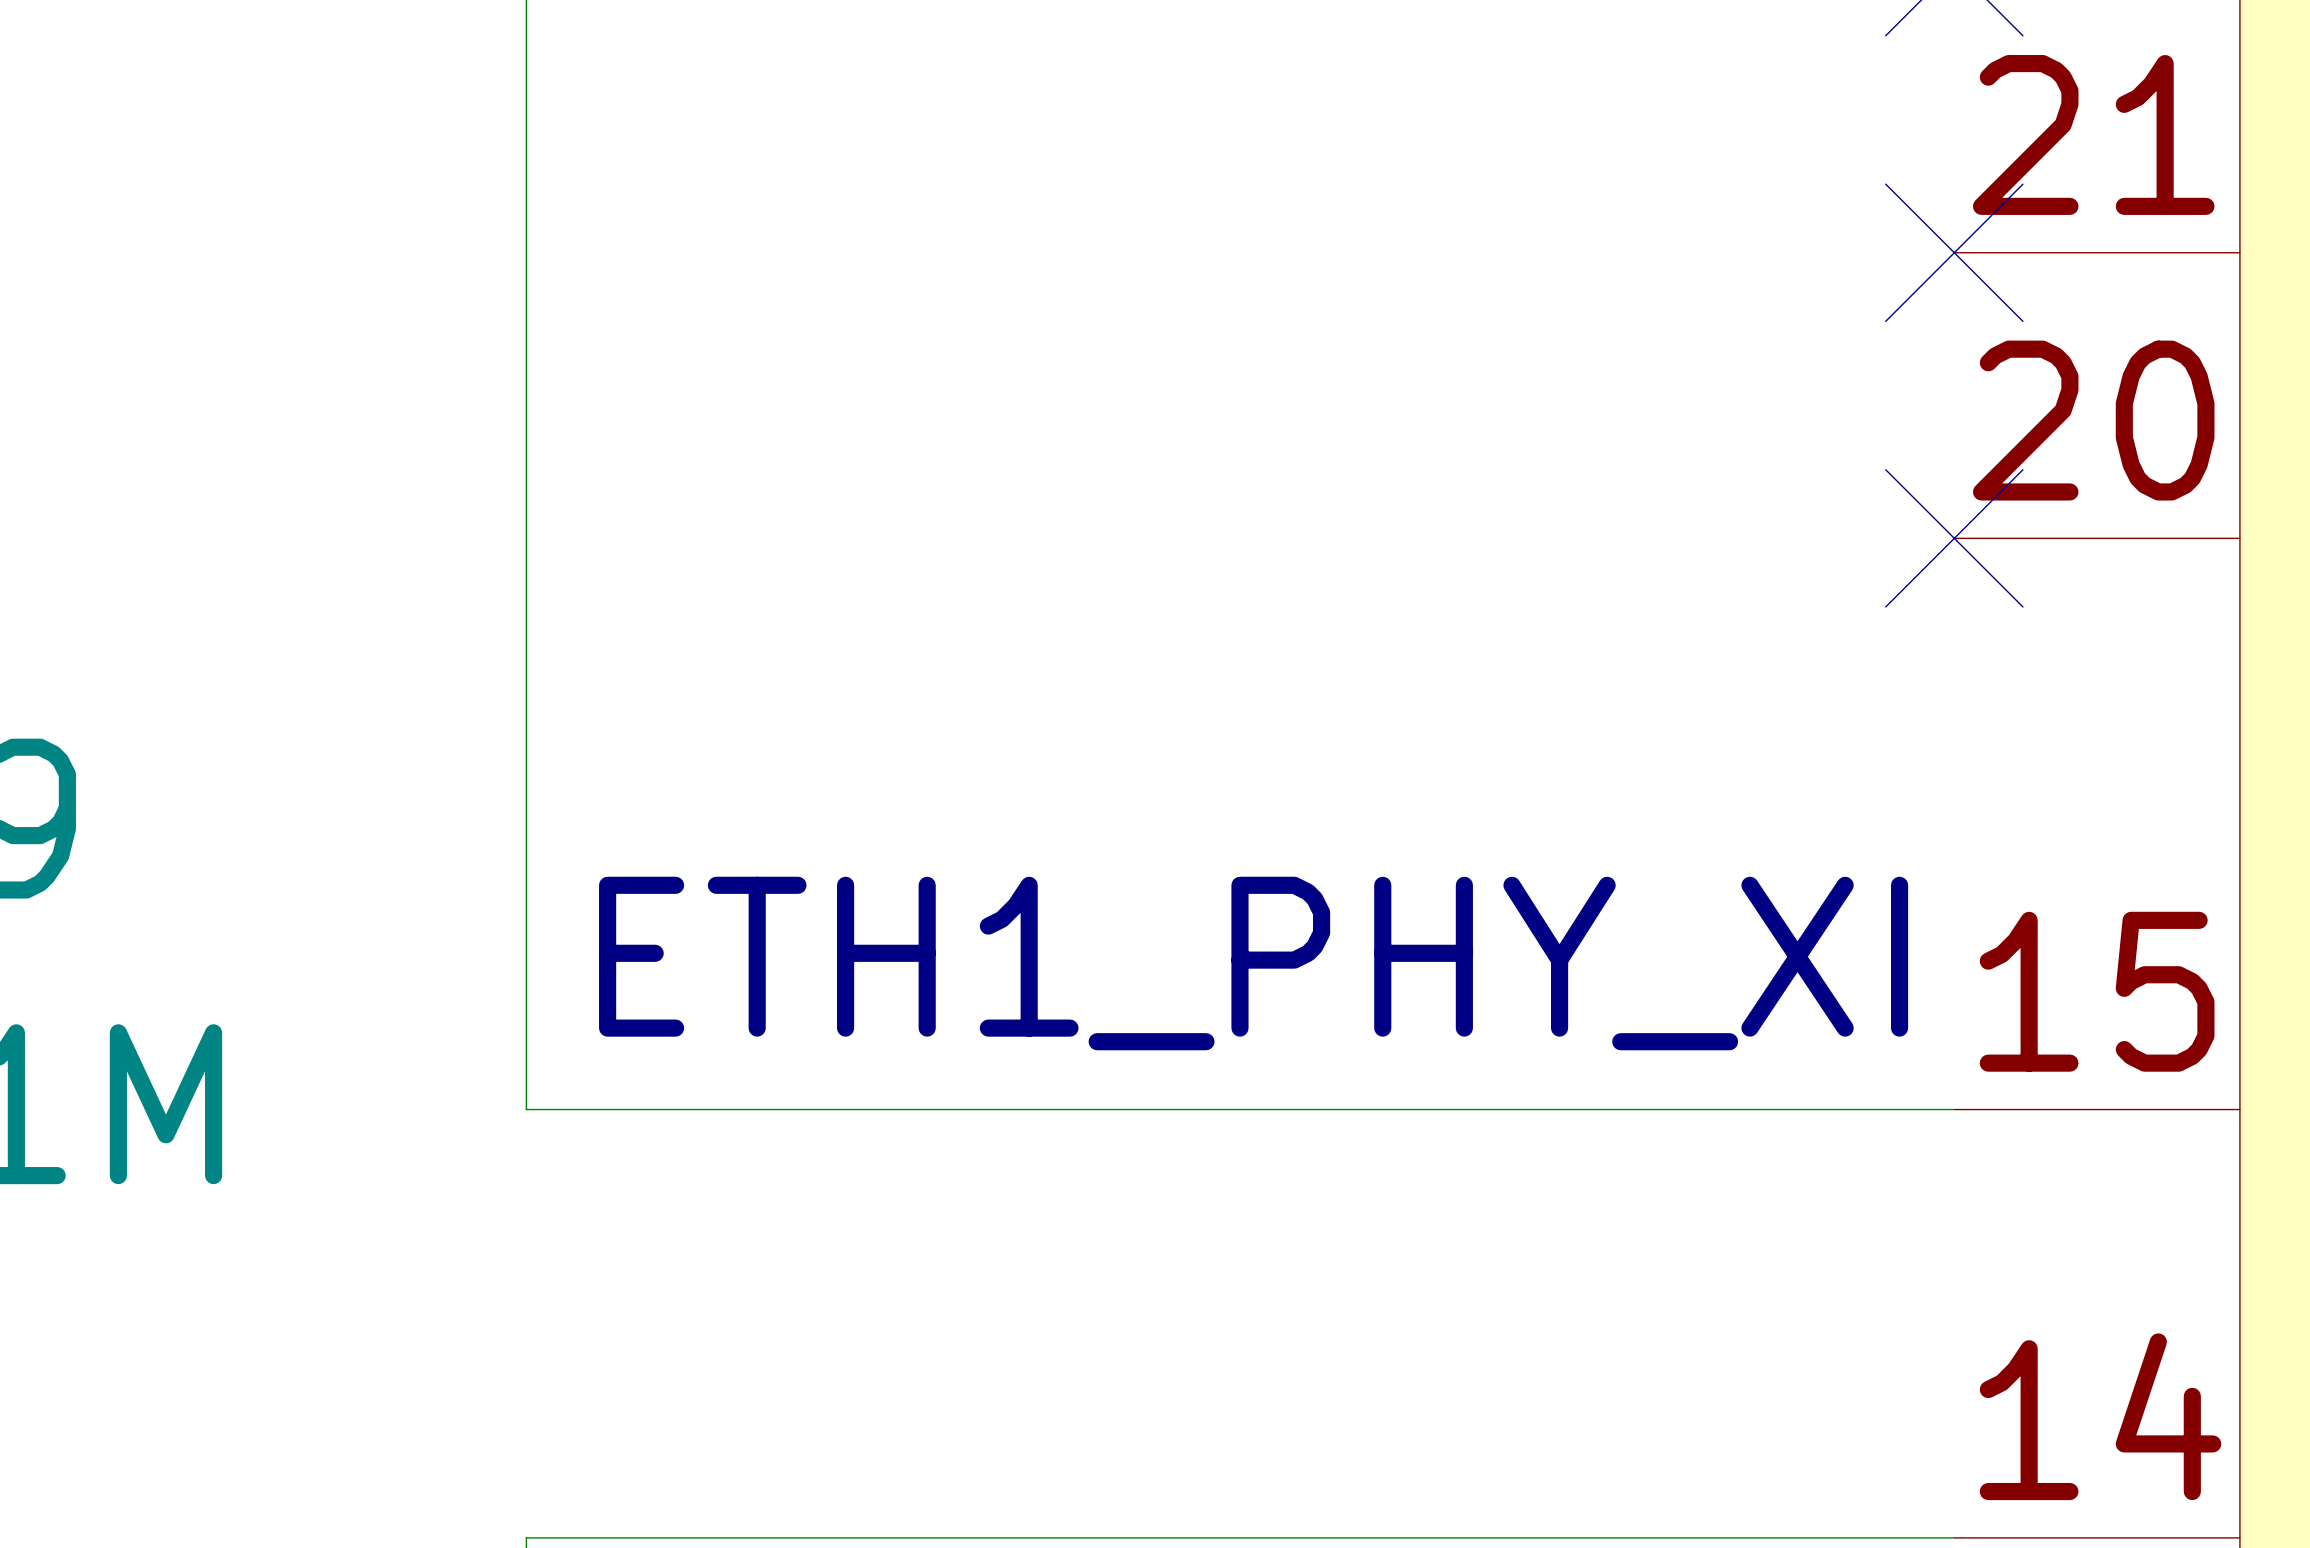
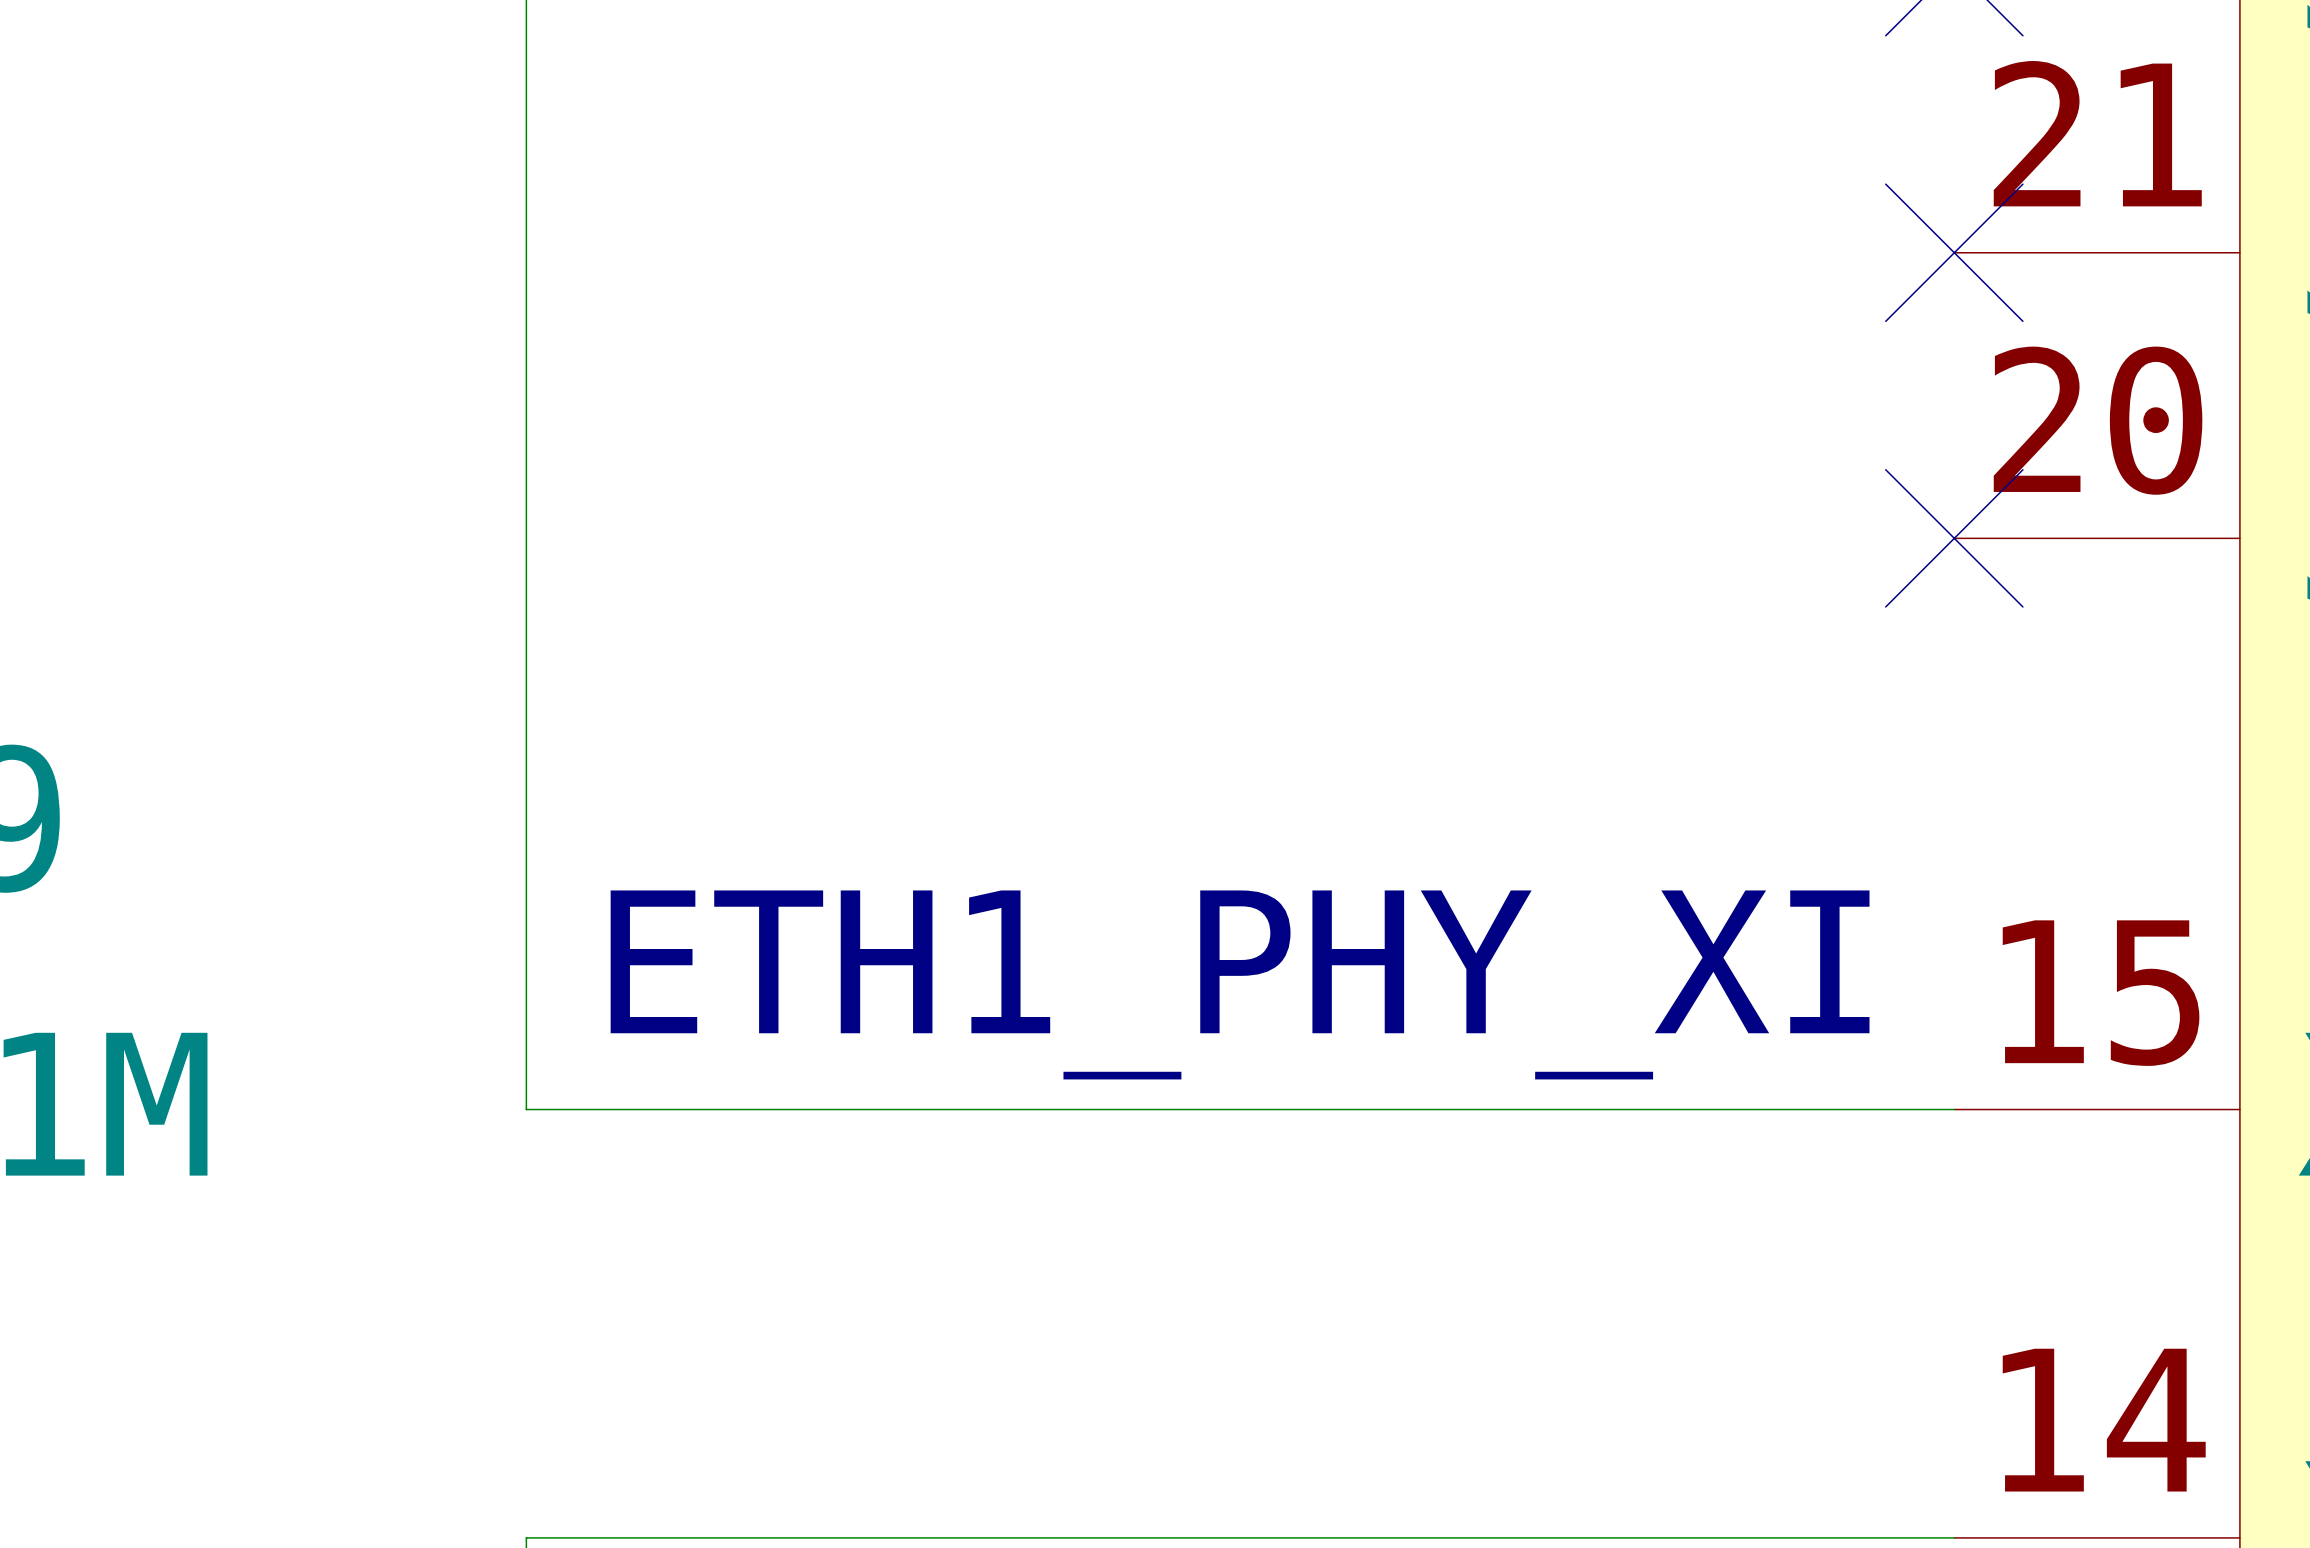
text position: ETH1_PHY_XI (1253, 963) -> ETH1_PHY_XI (1240, 984)

